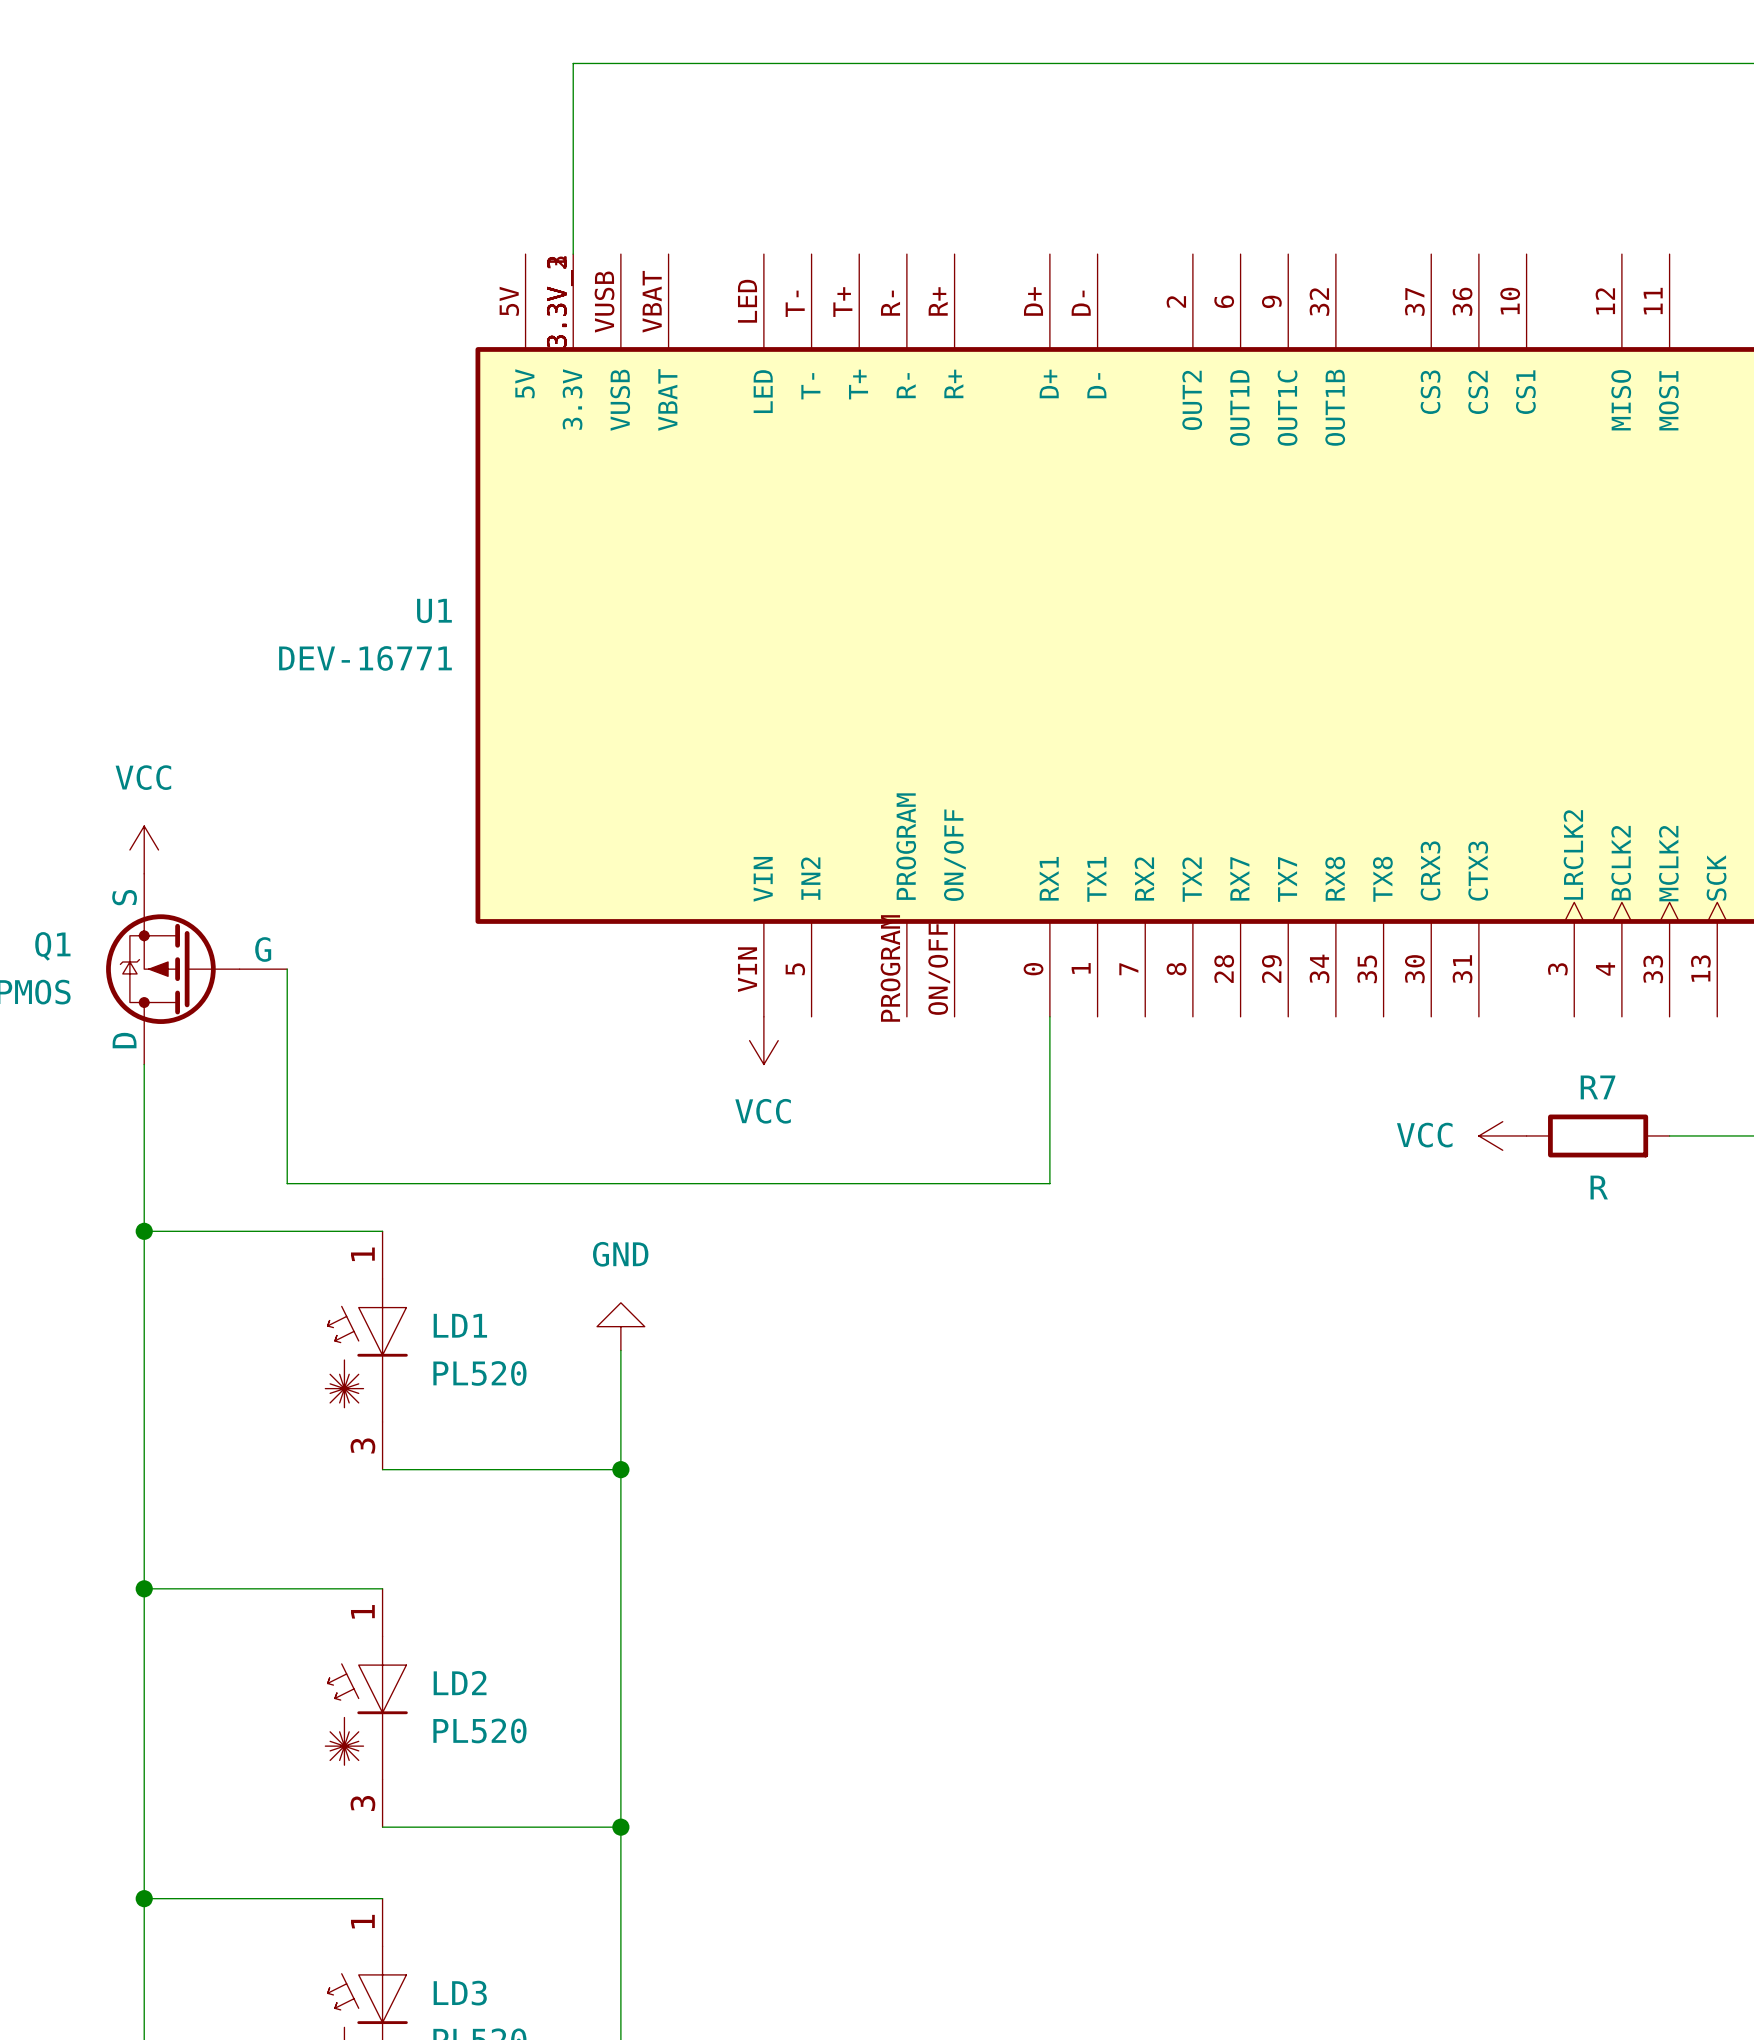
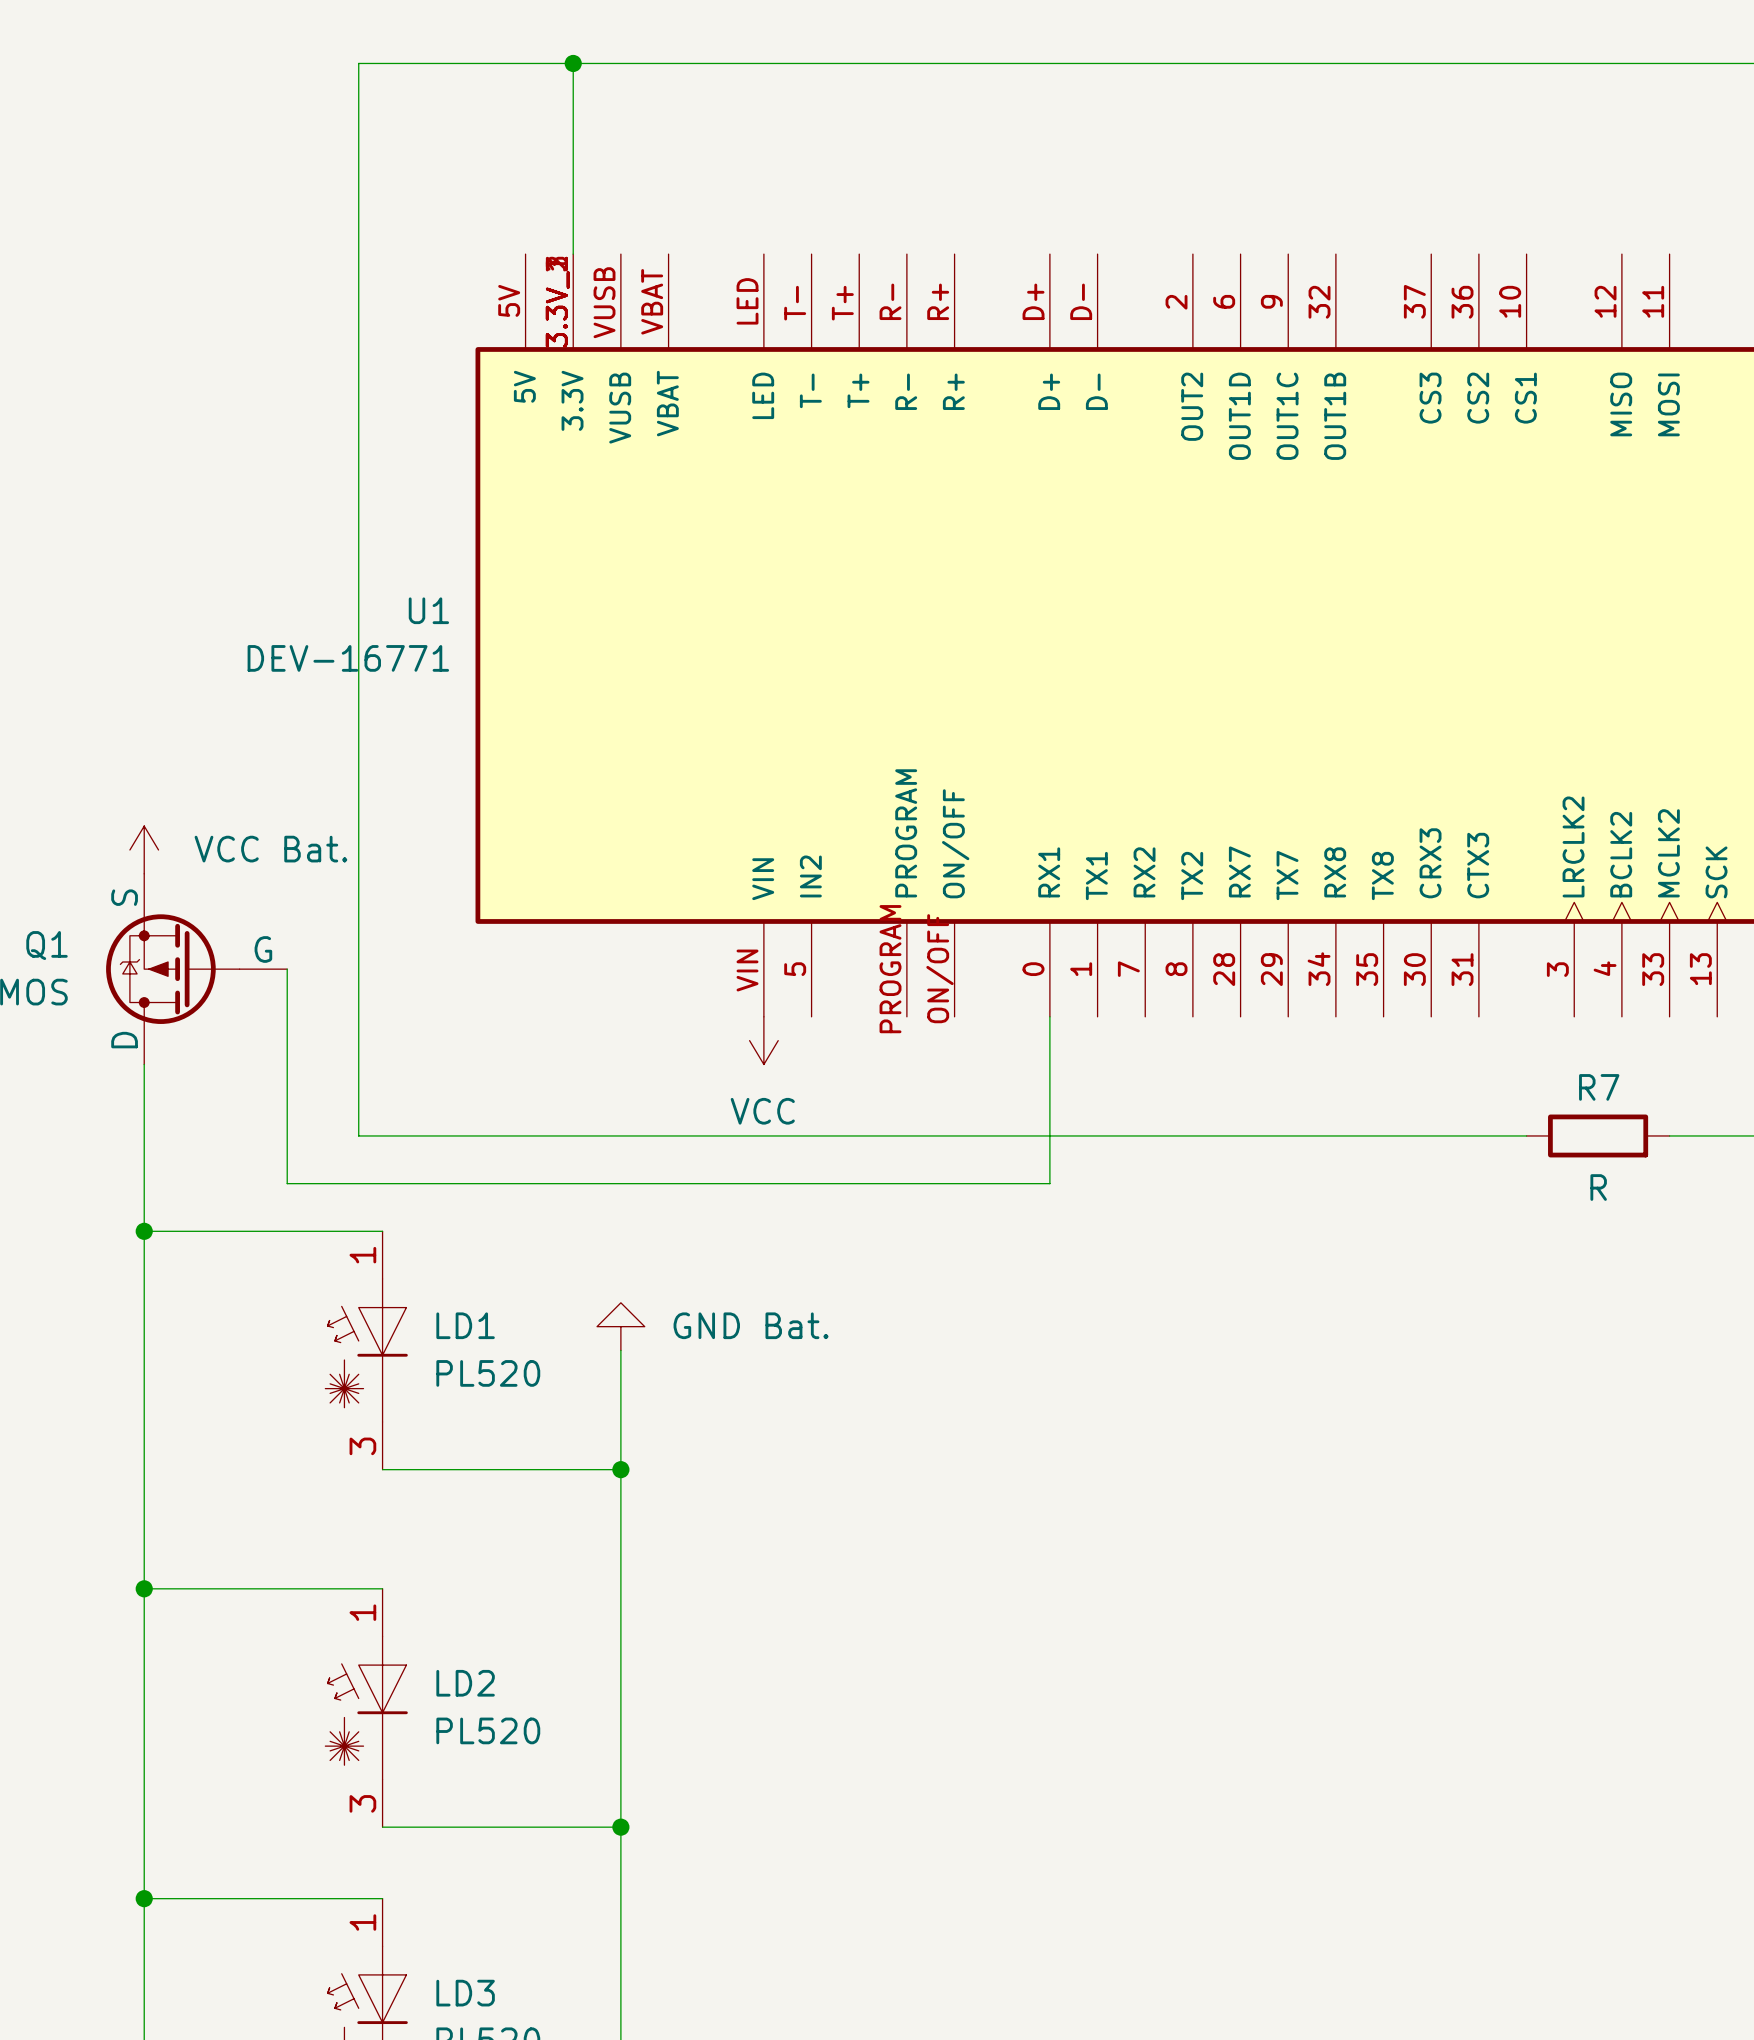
wire: none -> (573, 63) (358, 63) (358, 1135) (1526, 1135)
junction: none -> (573, 63)
power symbol: VCC (144, 849) -> VCC Bat. (144, 849)
power symbol: VCC (1502, 1135) -> none
power symbol: GND (620, 1326) -> GND Bat. (620, 1326)

